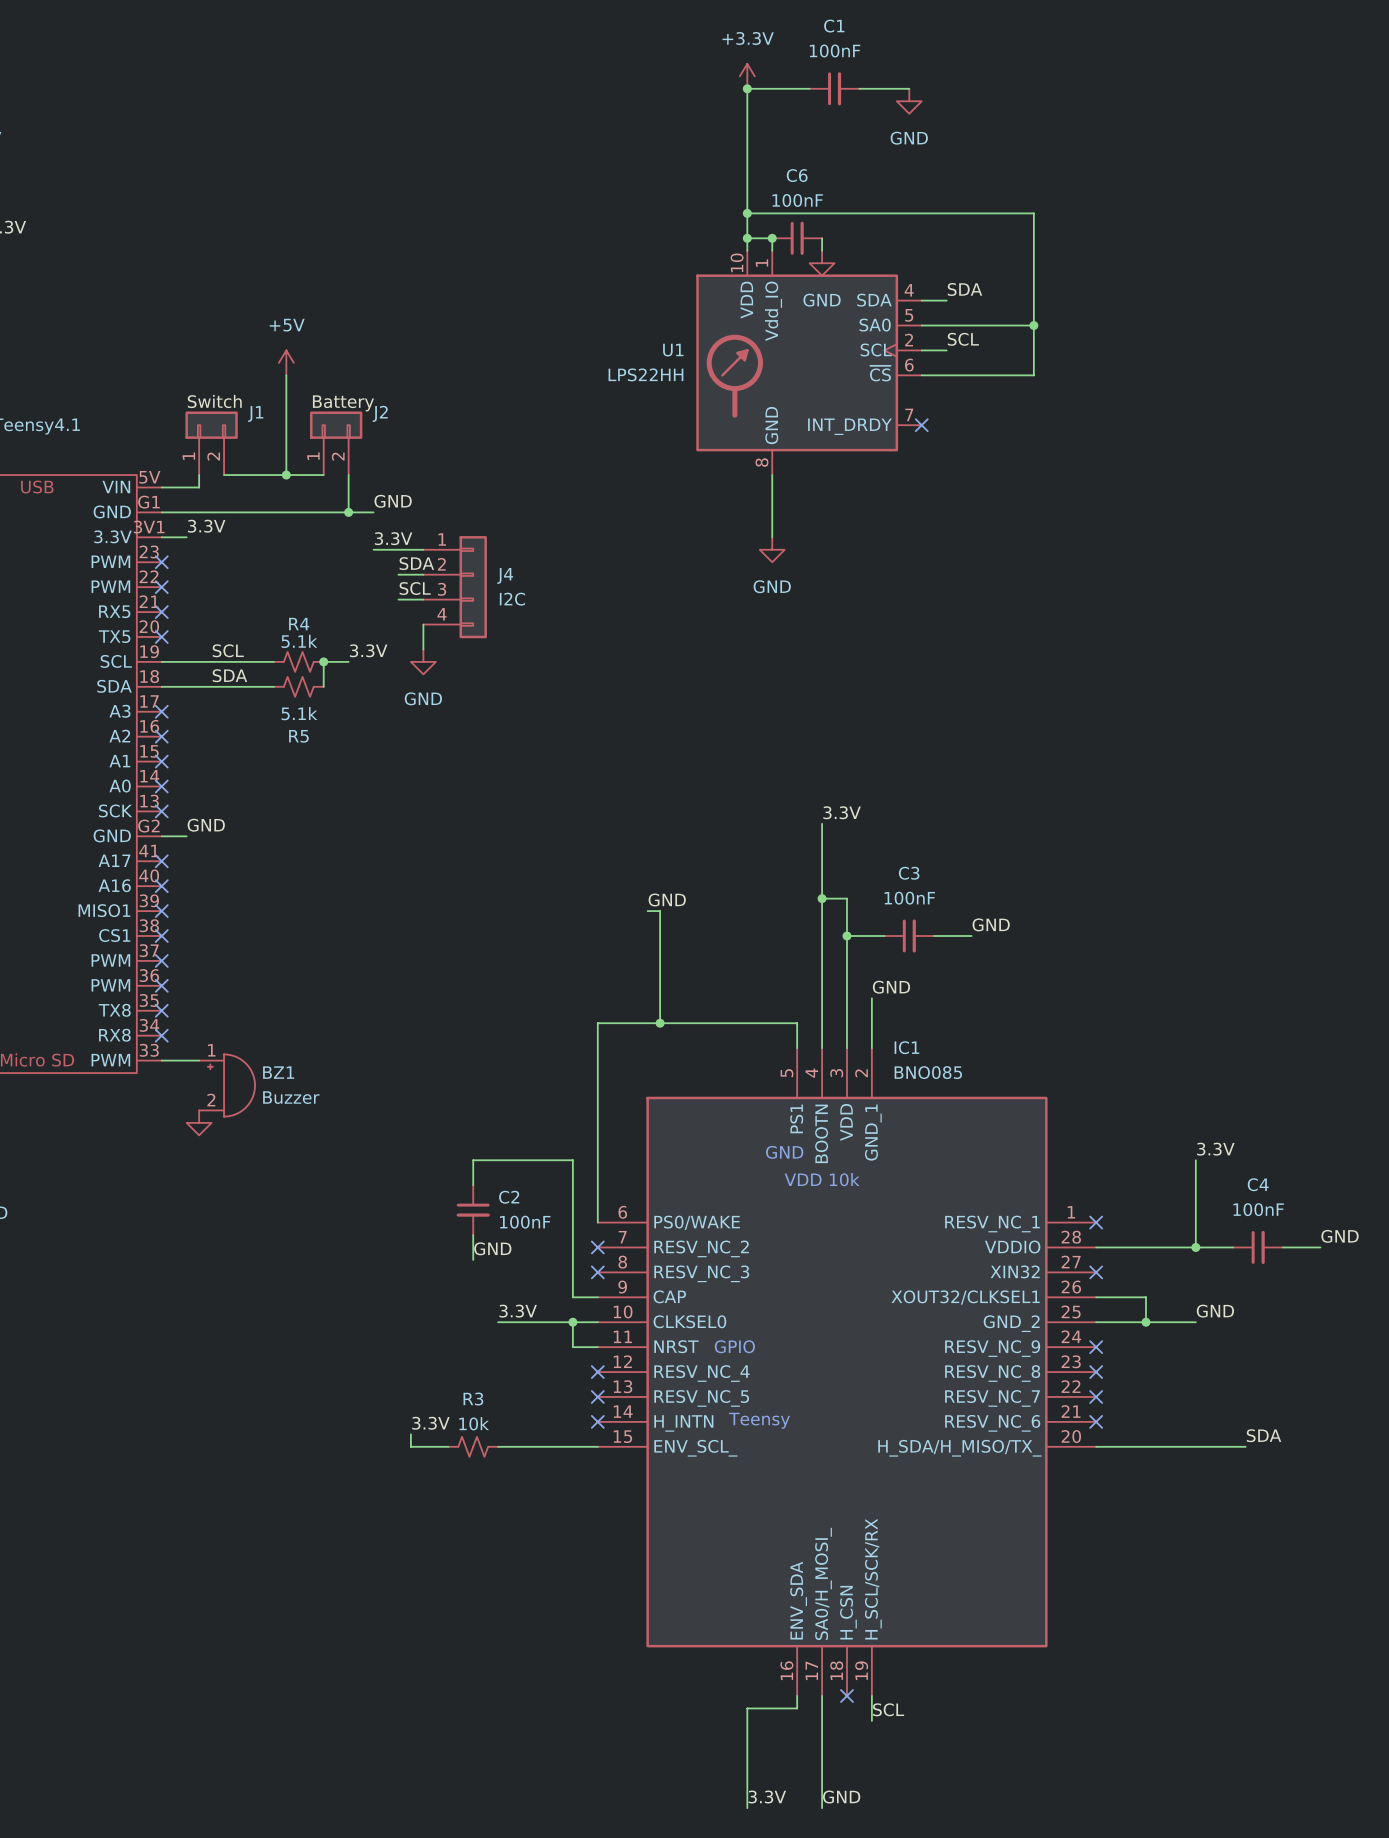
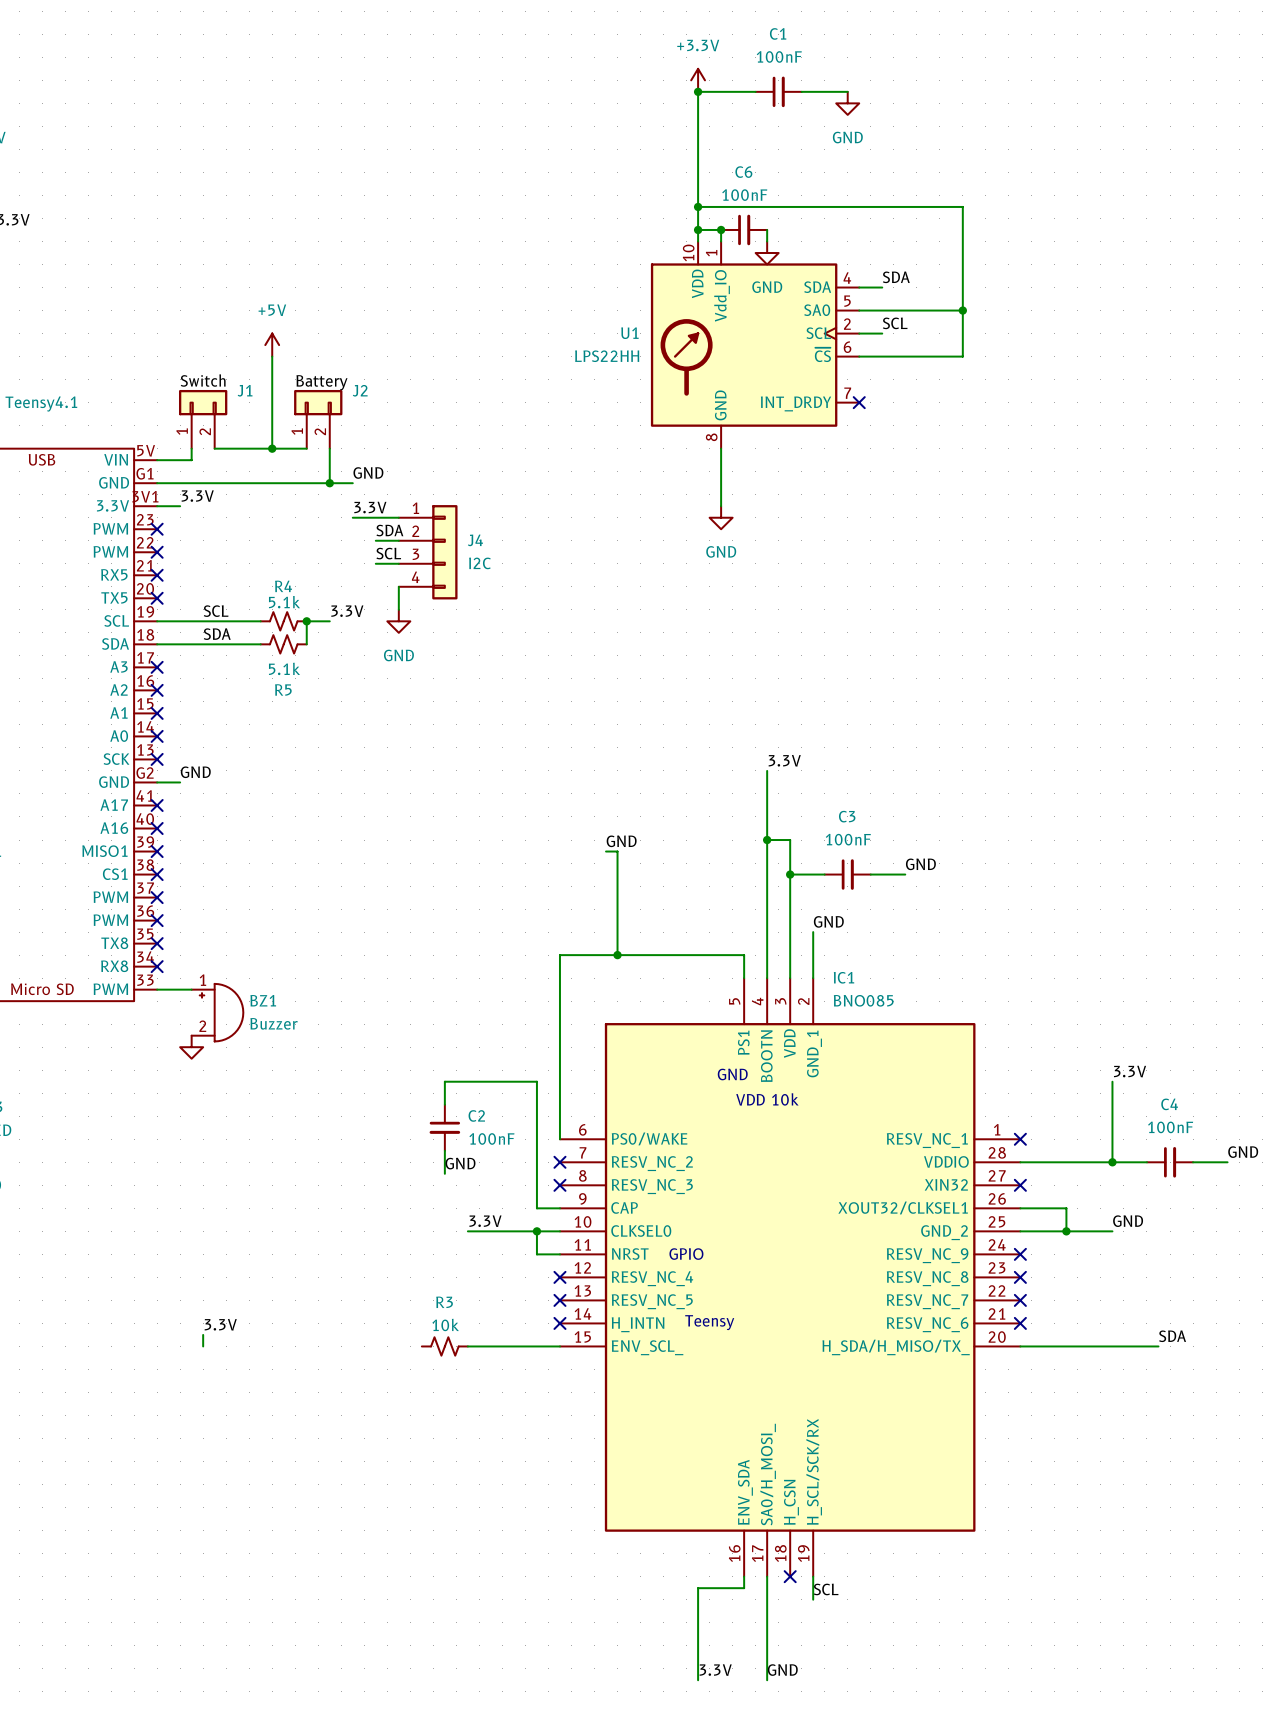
label position: 3.3V (430, 1423) -> 3.3V (220, 1324)
wire: none -> (203, 1334) (203, 1346)
wire: (410, 1434) (410, 1446) (448, 1446) -> none

